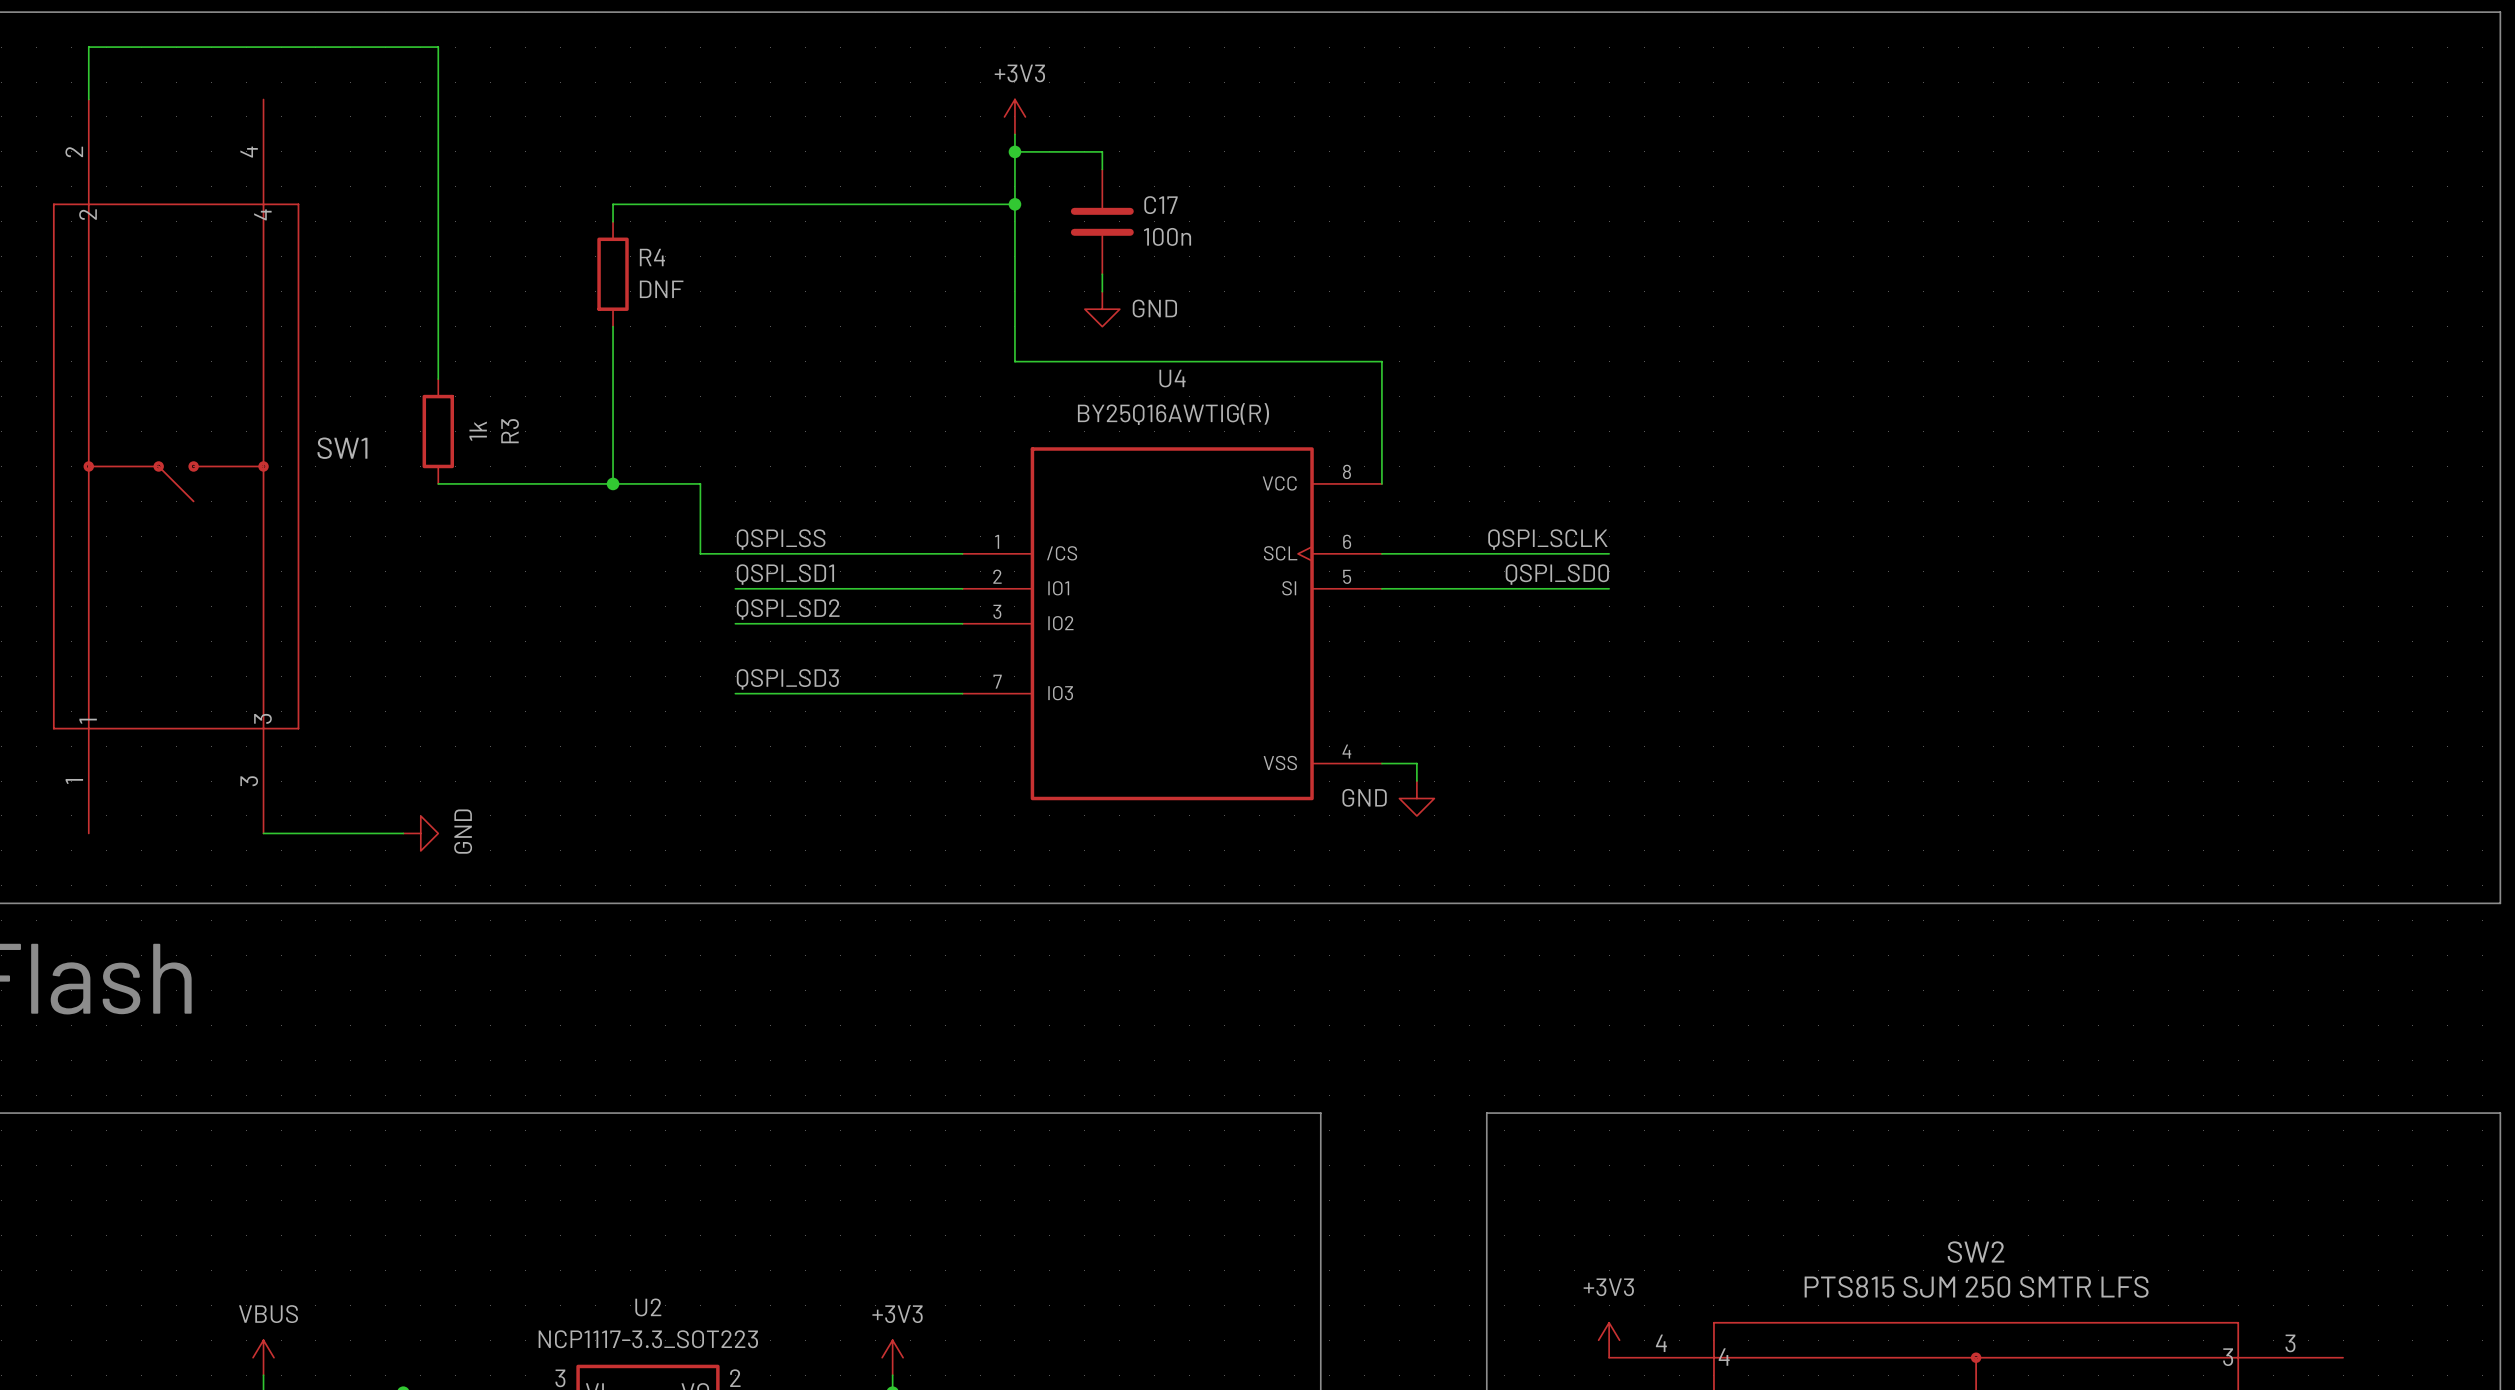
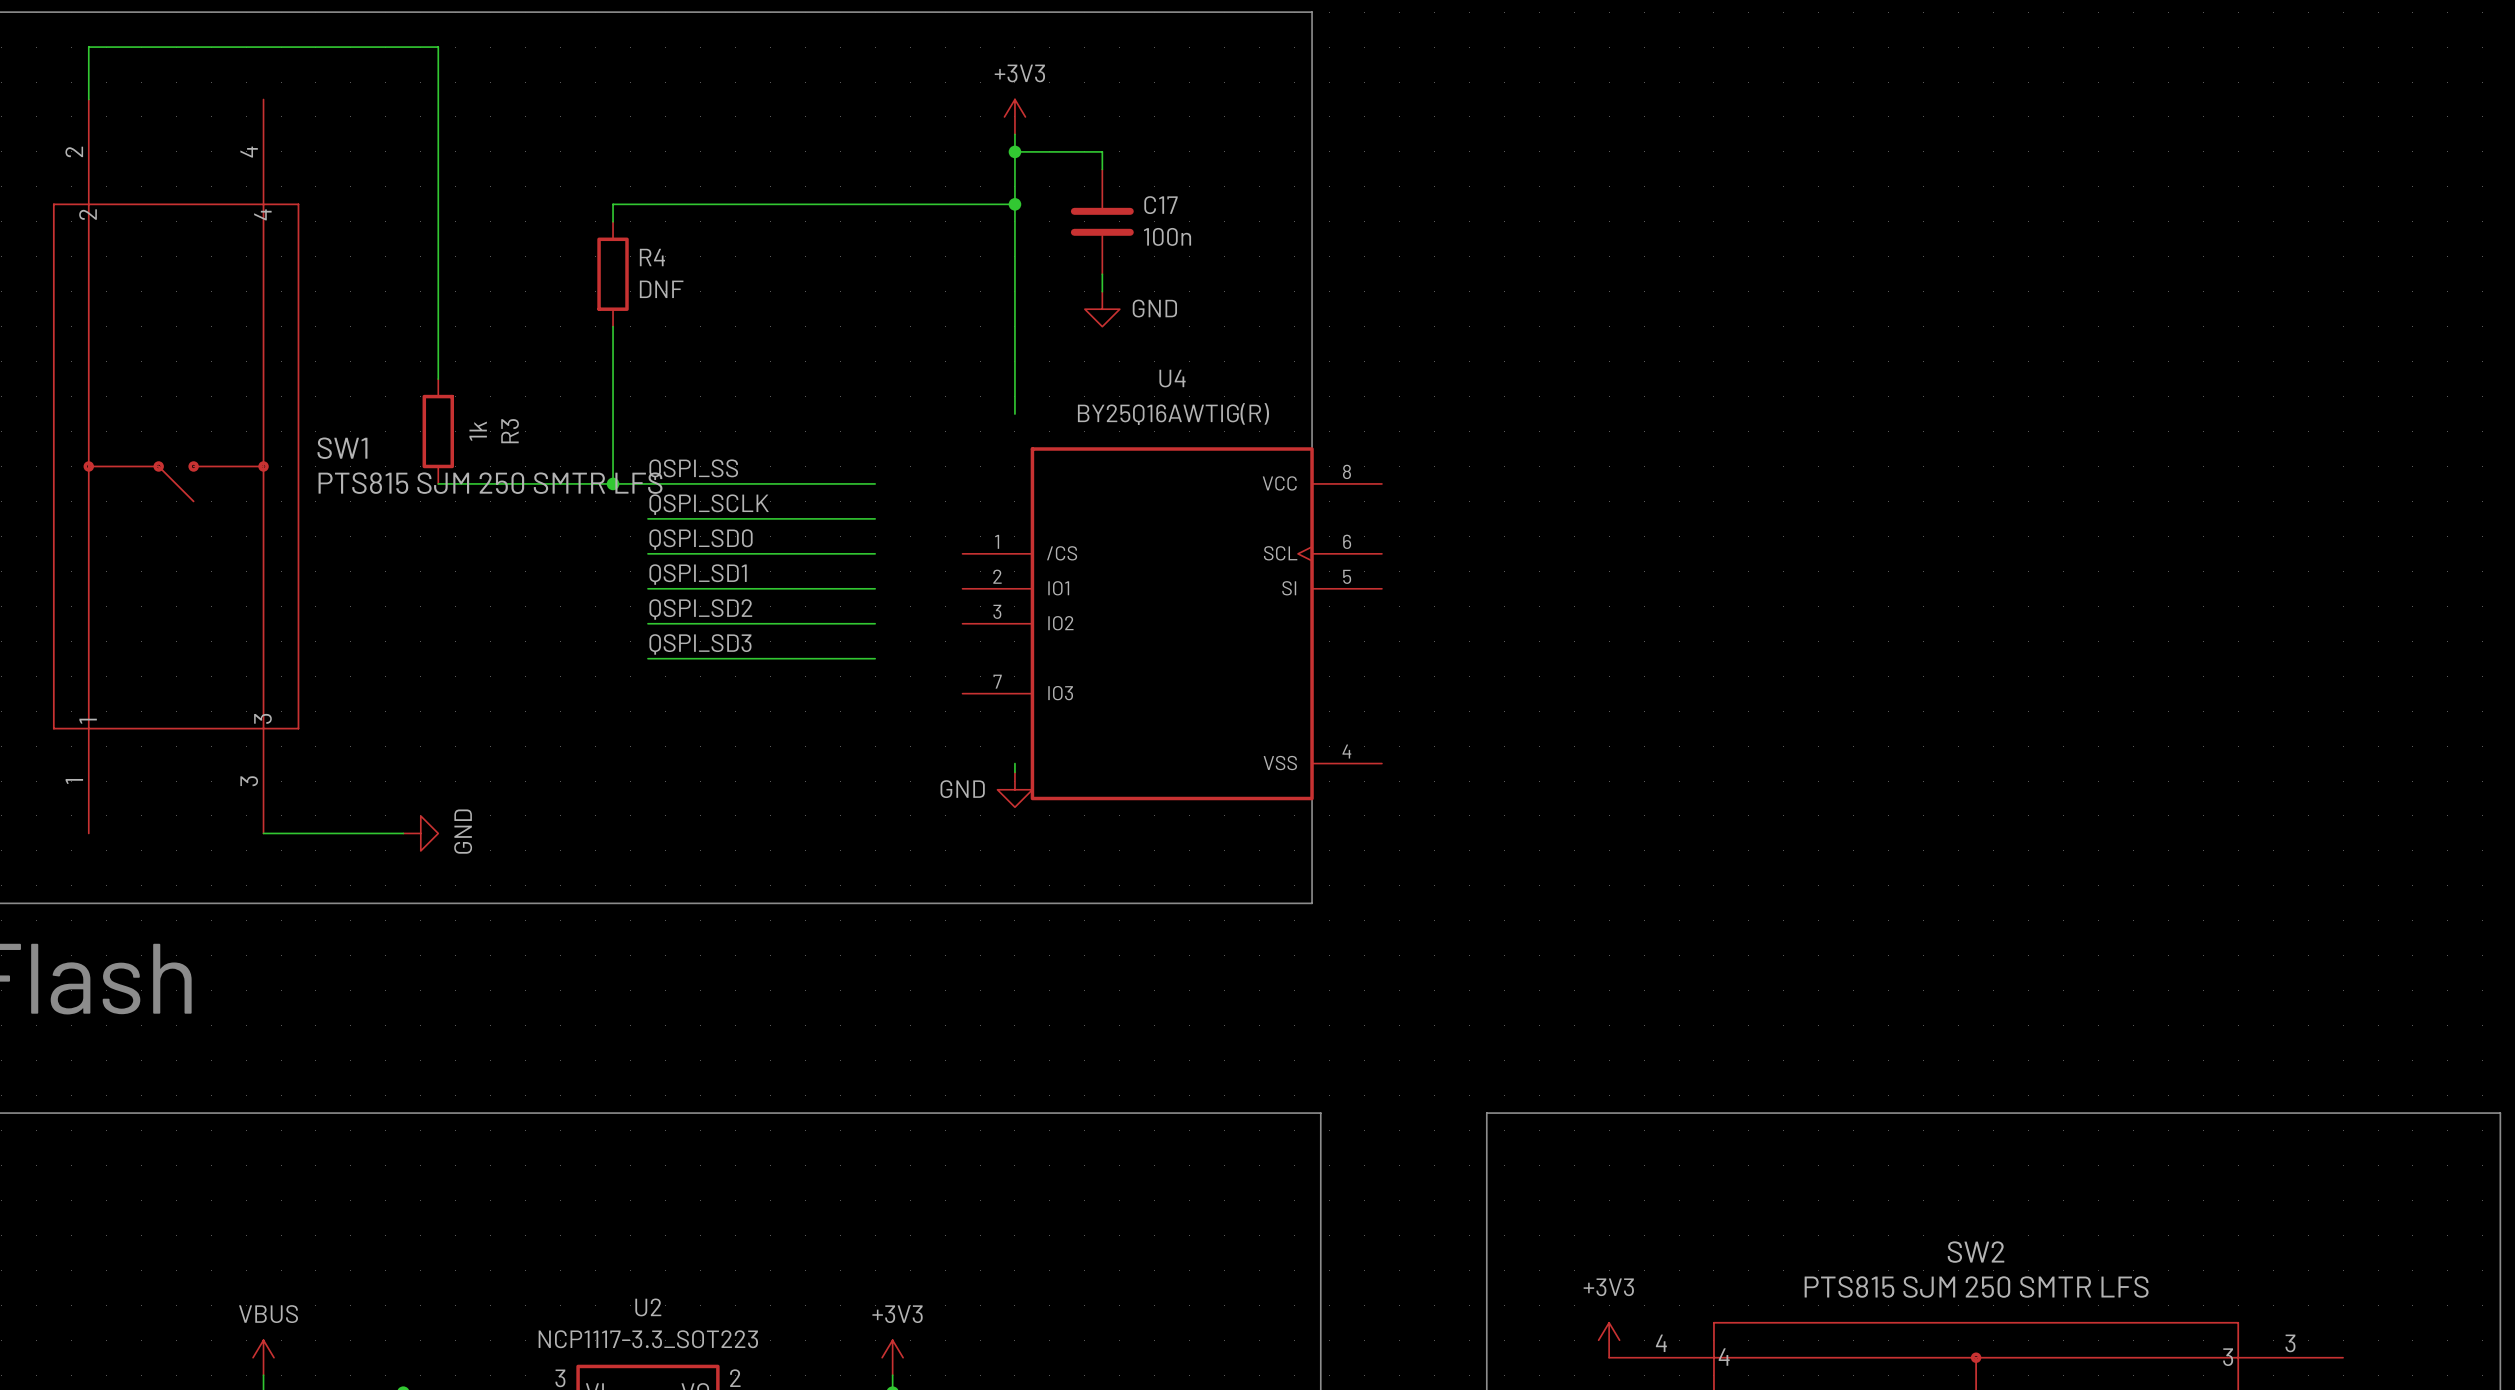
line: (1312, 12) (2500, 12) (2500, 903) (1312, 903) -> (1312, 12) (1312, 903)
wire: (1014, 361) (1381, 361) (1381, 483) -> (1014, 361) (1014, 414)
SW1 value: none -> PTS815 SJM 250 SMTR LFS (490, 483)
wire: (700, 483) (700, 553) -> (647, 553) (700, 553)
wire: none -> (700, 483) (875, 483)
label: none -> QSPI_SCLK (709, 504)
wire: none -> (647, 518) (875, 518)
label: none -> QSPI_SD0 (701, 539)
label position: QSPI_SS (781, 539) -> QSPI_SS (693, 469)
label: QSPI_SCLK (1547, 539) -> none
wire: (875, 553) (962, 553) -> none
wire: (1381, 553) (1609, 553) -> none
label position: QSPI_SD1 (785, 574) -> QSPI_SD1 (698, 574)
label: QSPI_SD0 (1557, 574) -> none
wire: (875, 588) (962, 588) -> (647, 588) (735, 588)
wire: (1381, 588) (1609, 588) -> none
label position: QSPI_SD2 (788, 609) -> QSPI_SD2 (700, 609)
wire: (875, 623) (962, 623) -> (647, 623) (735, 623)
label position: QSPI_SD3 (787, 679) -> QSPI_SD3 (700, 644)
wire: (735, 693) (962, 693) -> (647, 658) (875, 658)
wire: none -> (1014, 763) (1014, 772)
wire: (1381, 763) (1416, 763) (1416, 781) -> none
power symbol: none -> GND (1014, 789)
power symbol: GND (1416, 798) -> none

